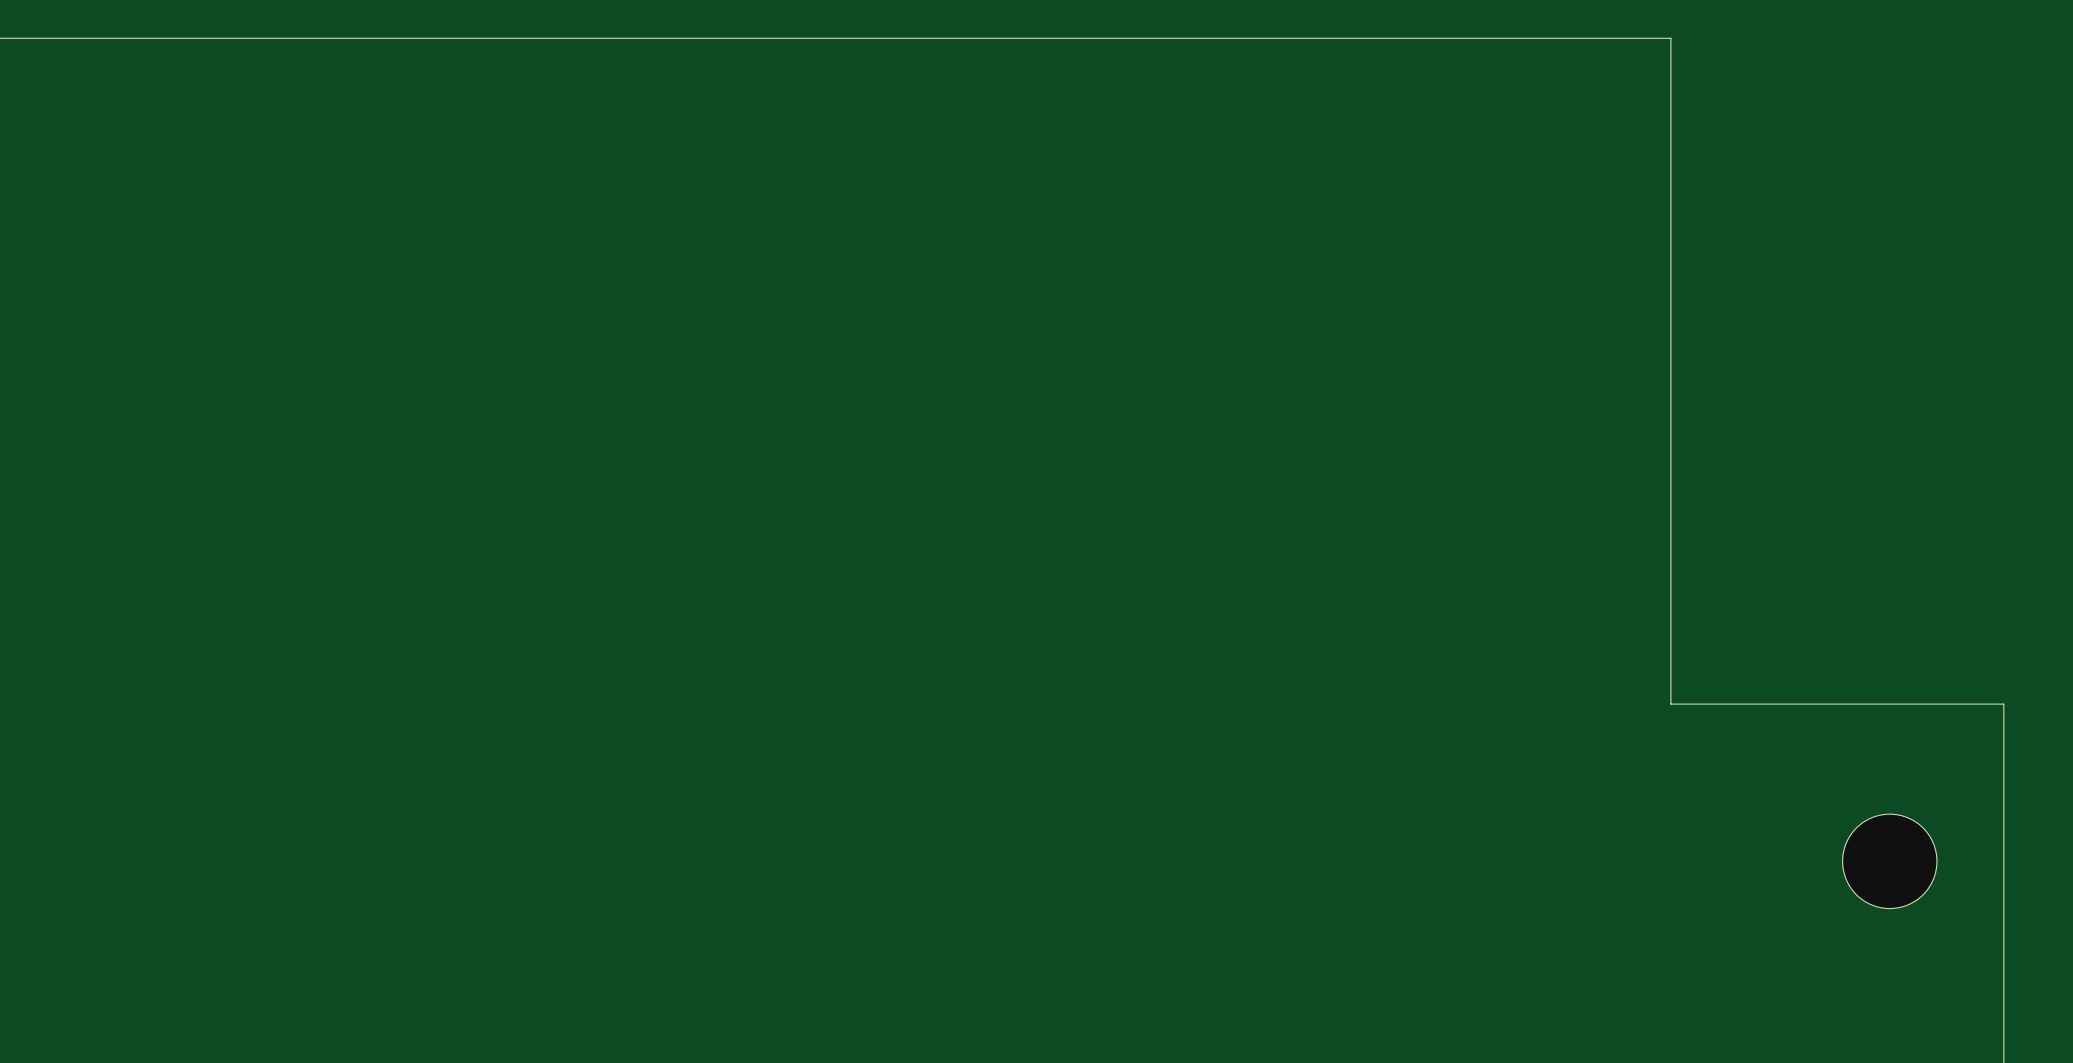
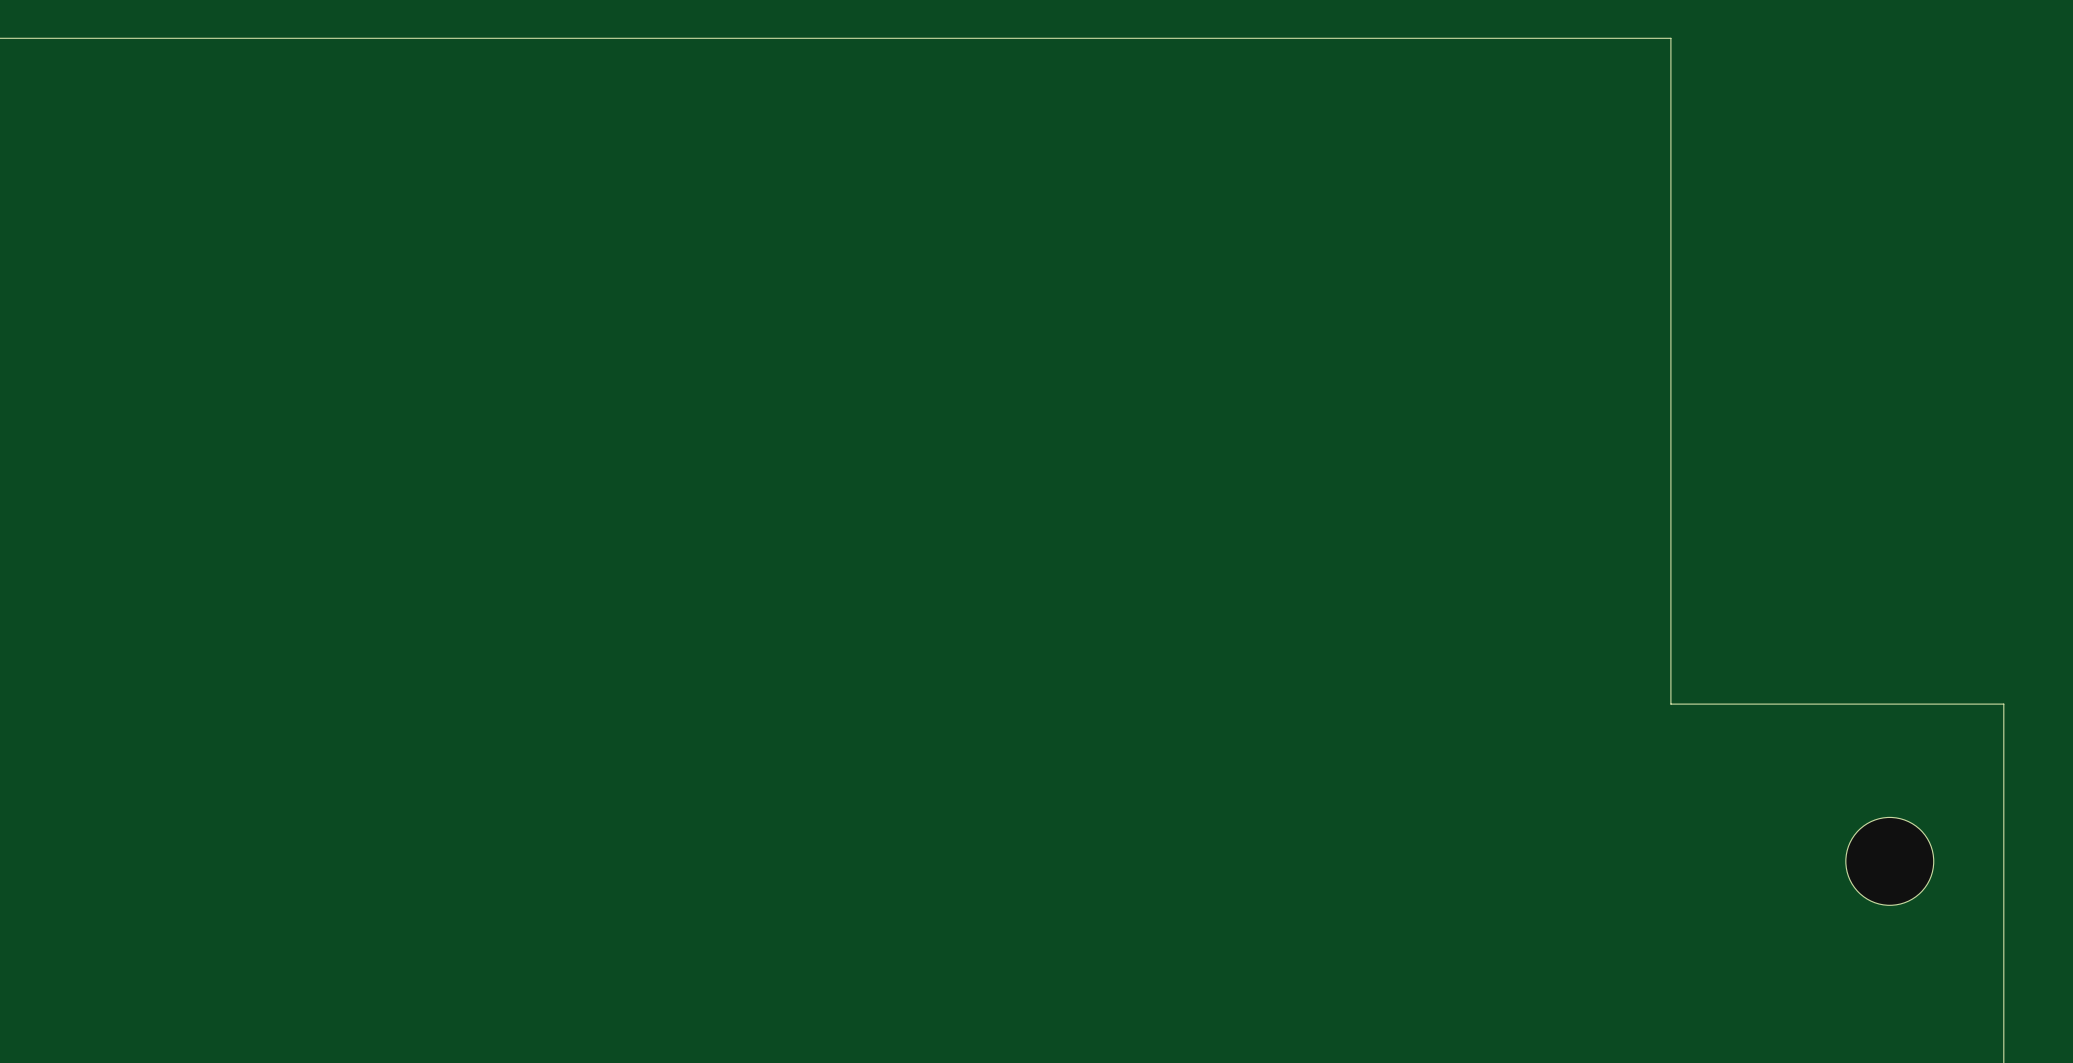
hole: (1889, 861) -> none
part: none -> (1889, 861)

